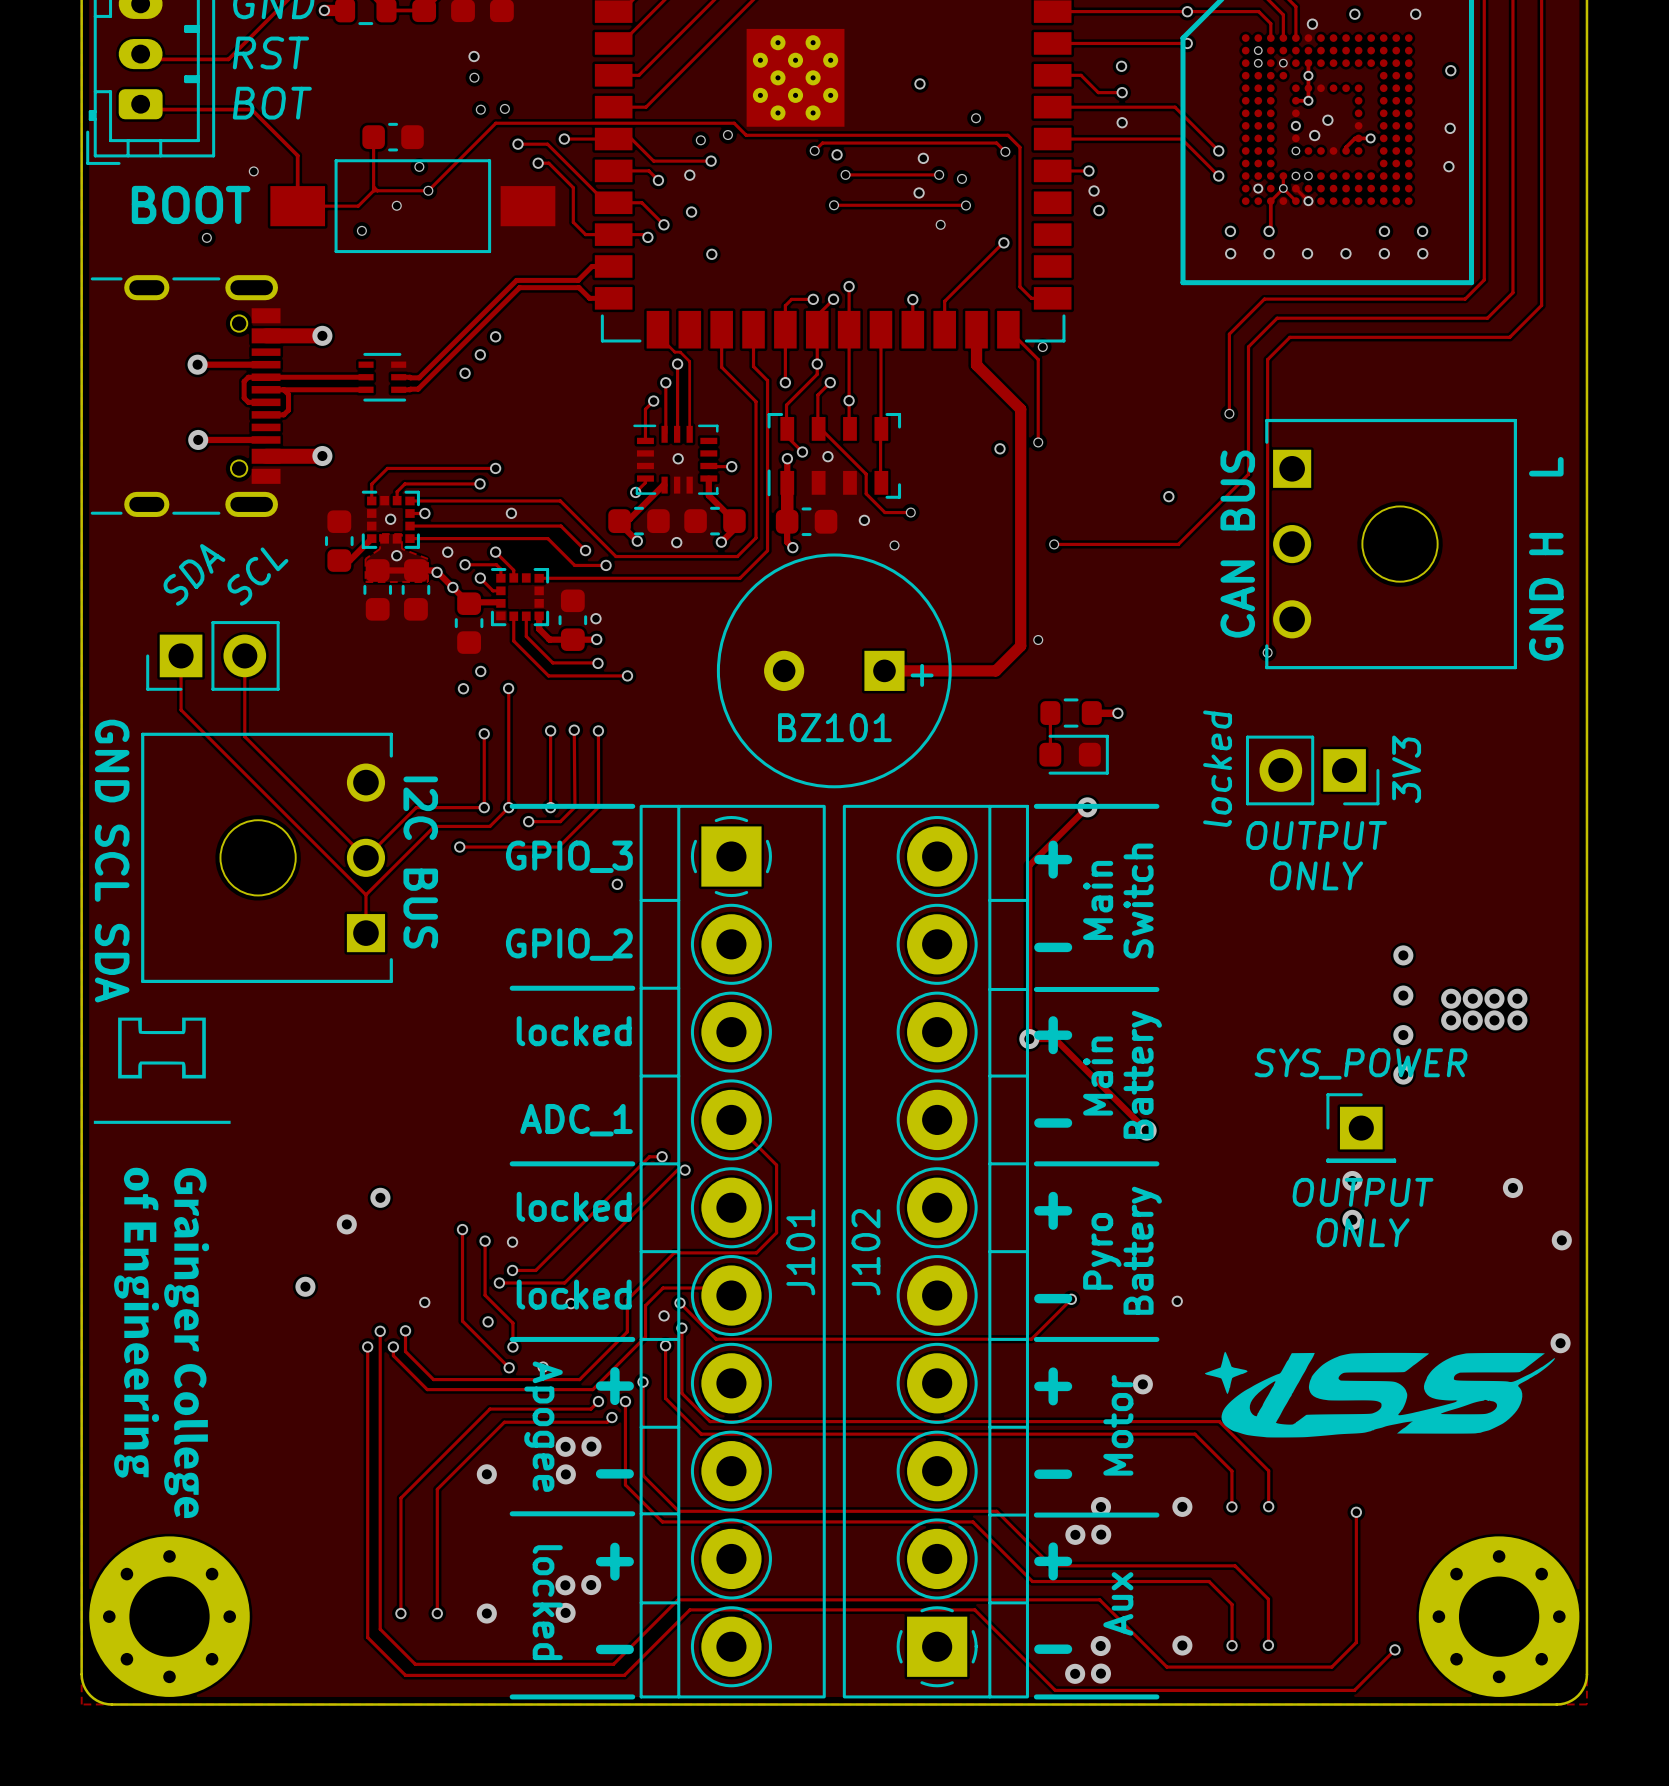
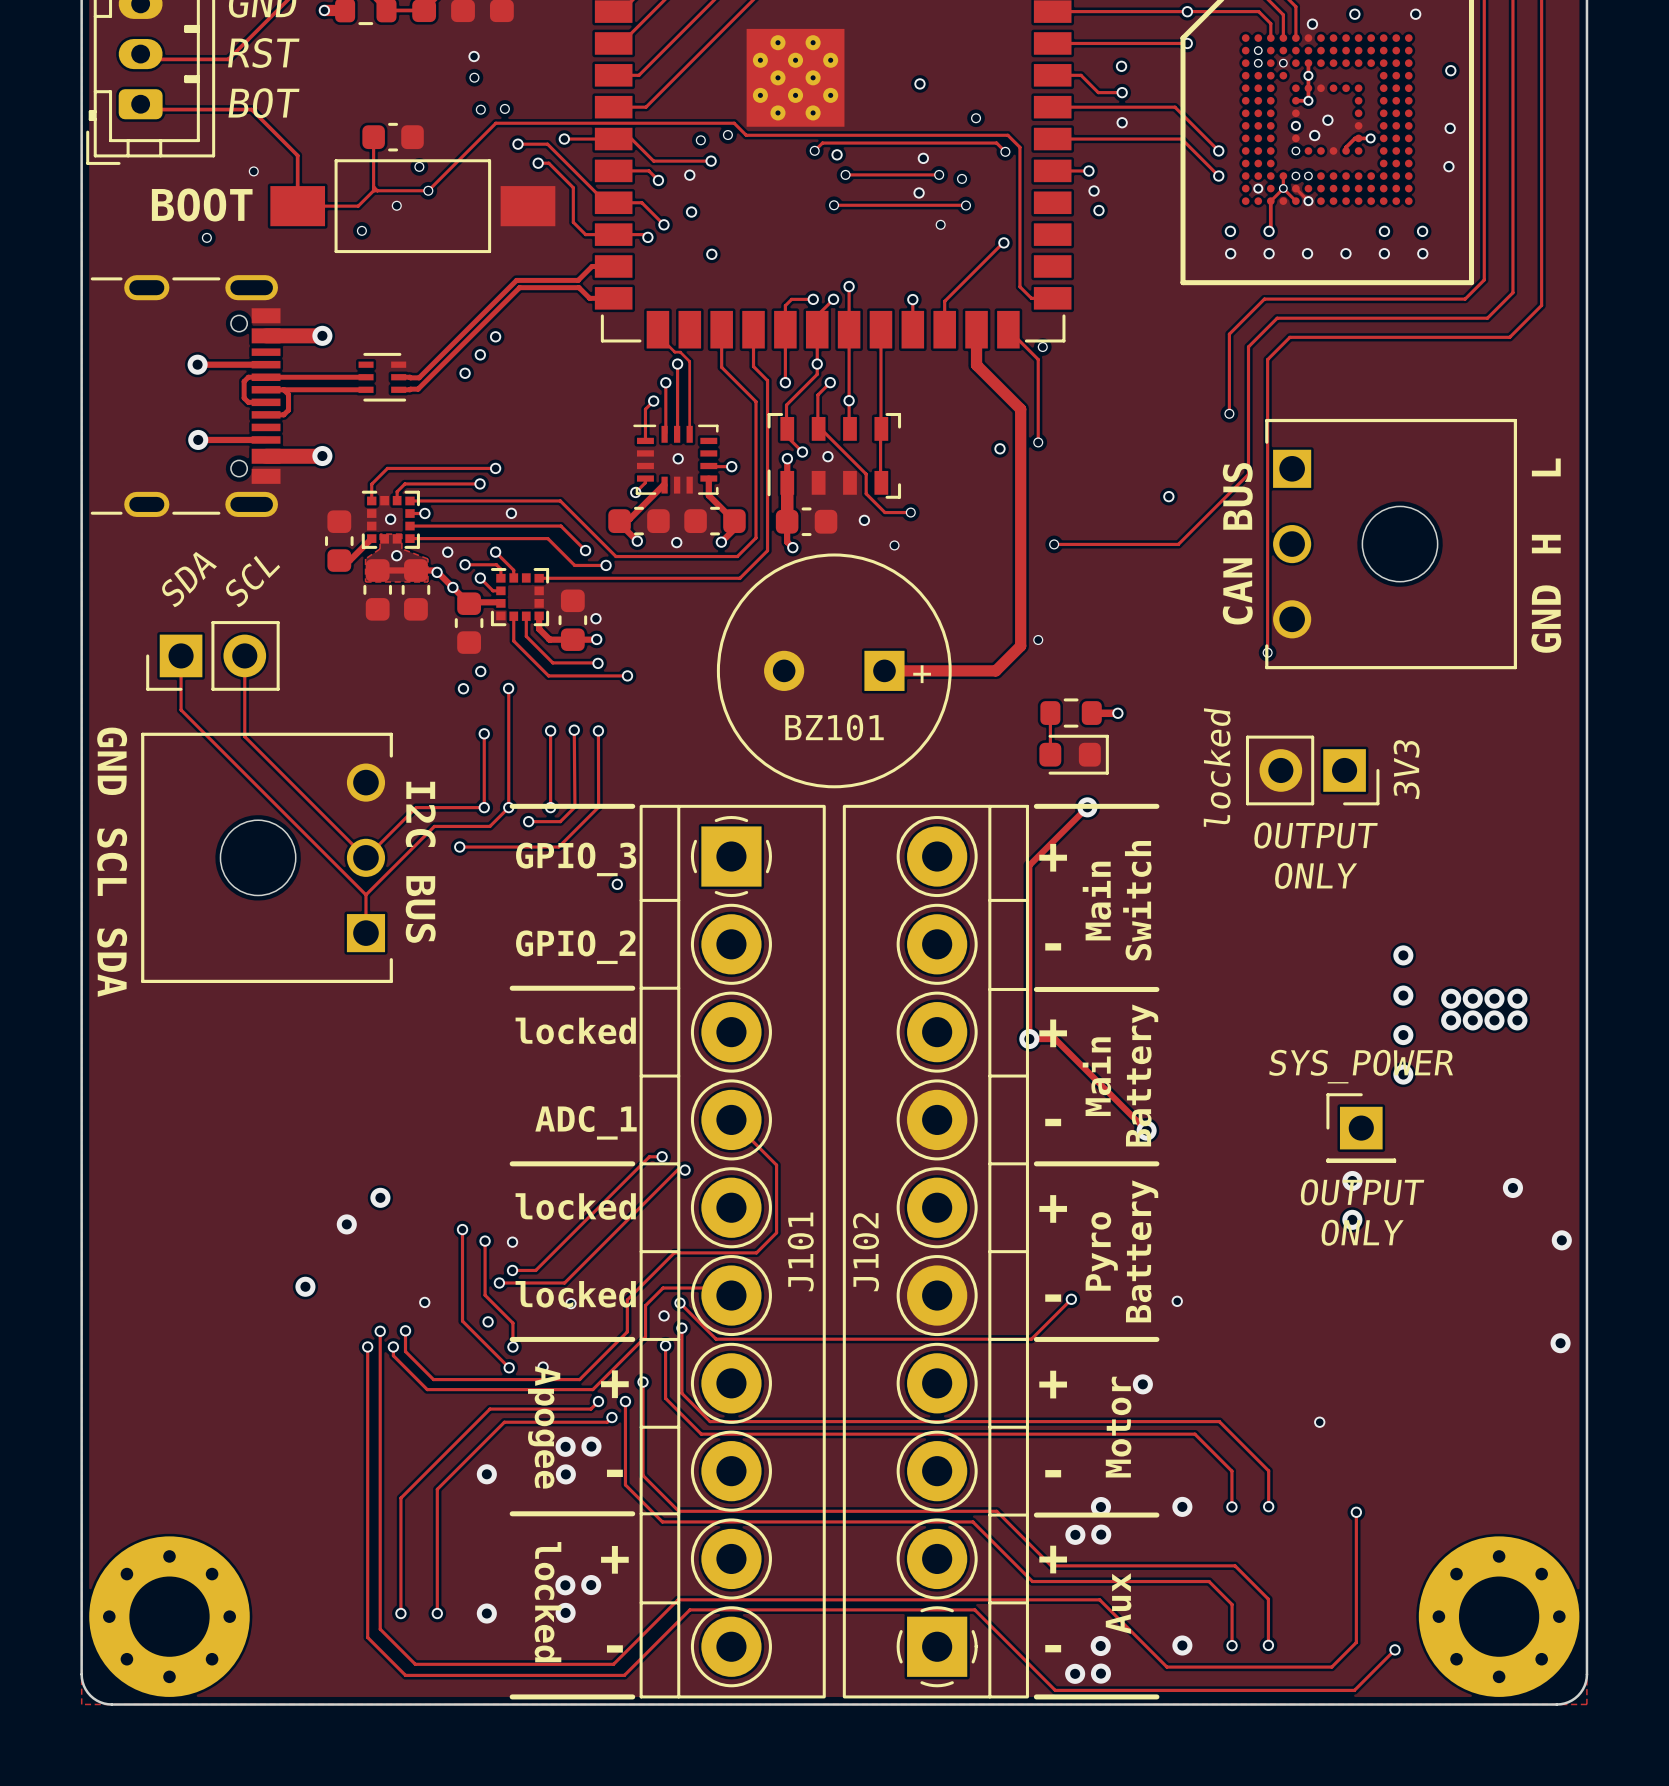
drawing: [93, 1017, 231, 1519] -> none
drawing: [1204, 1351, 1555, 1438] -> none

